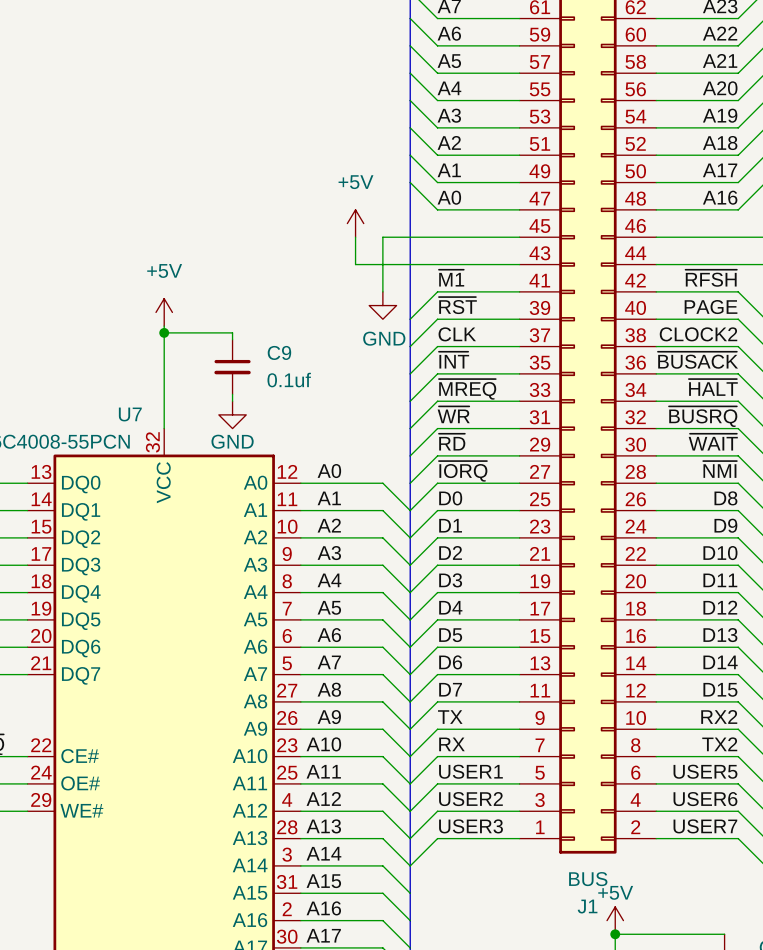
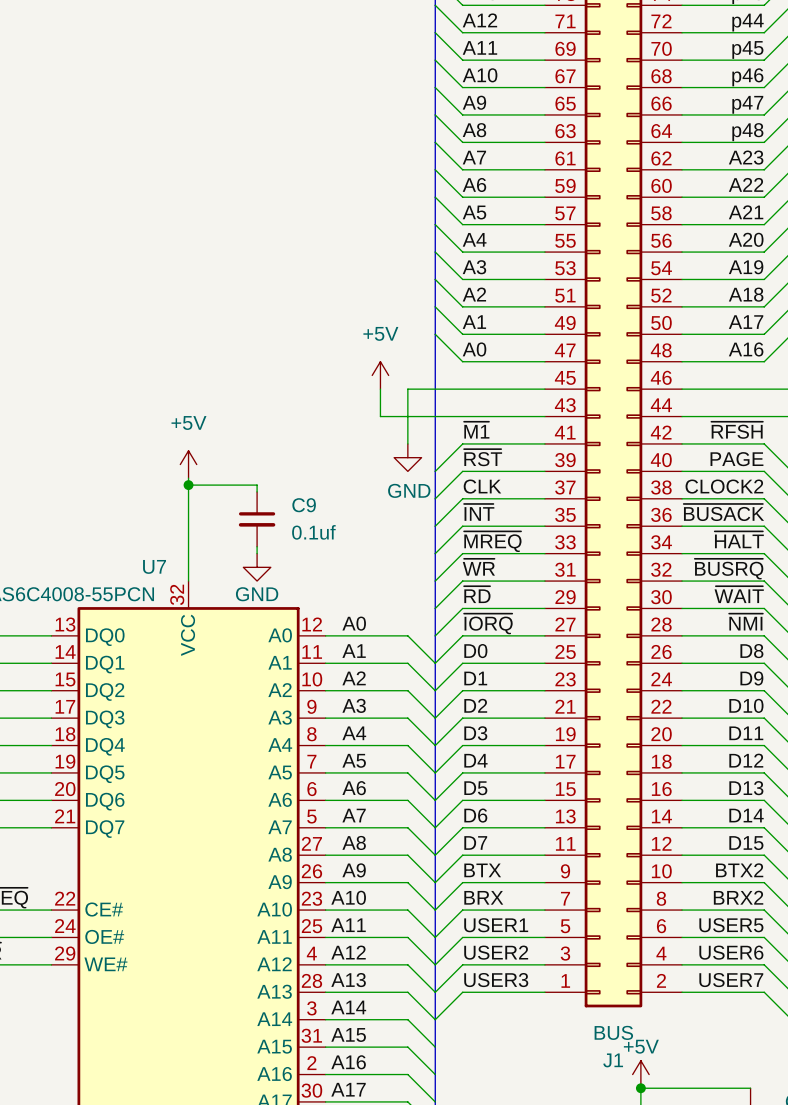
label: RX2 (719, 716) -> BTX2 (739, 870)
label: TX (450, 717) -> BTX (482, 870)
label: RX (451, 744) -> BRX (483, 897)
label: TX2 (719, 744) -> BRX2 (738, 897)

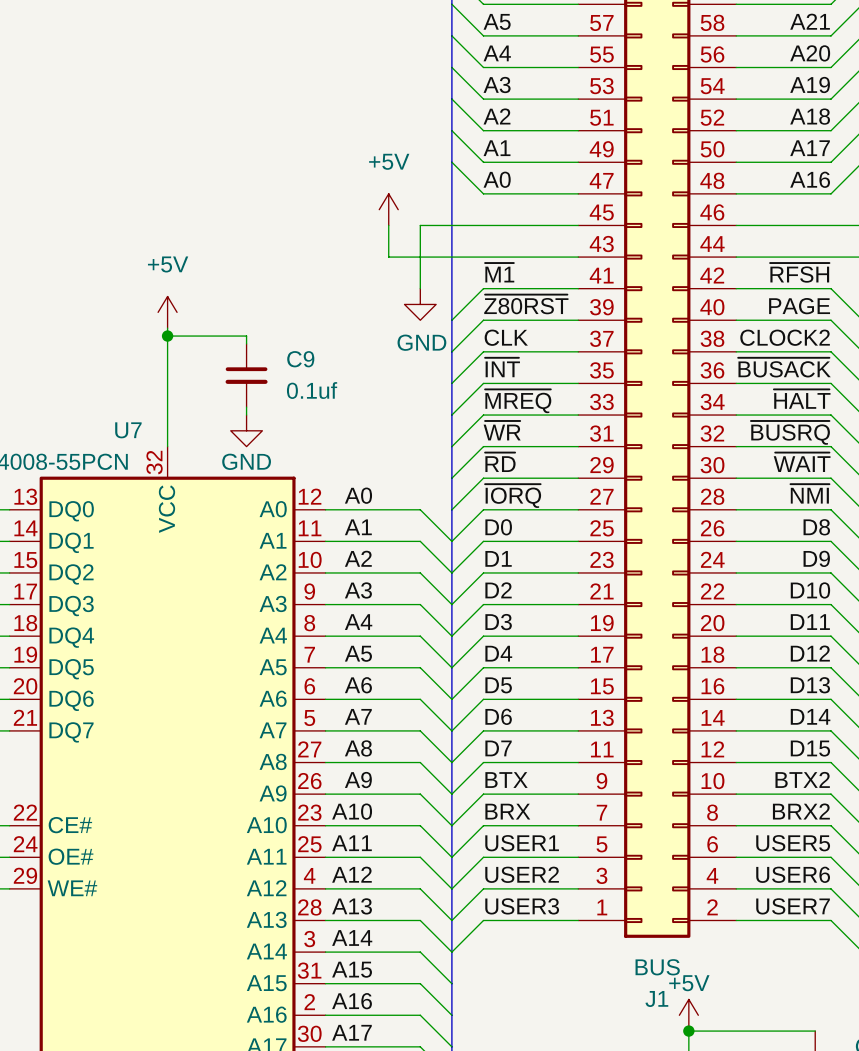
label: ~{RST} (483, 457) -> ~{Z80RST} (526, 304)

